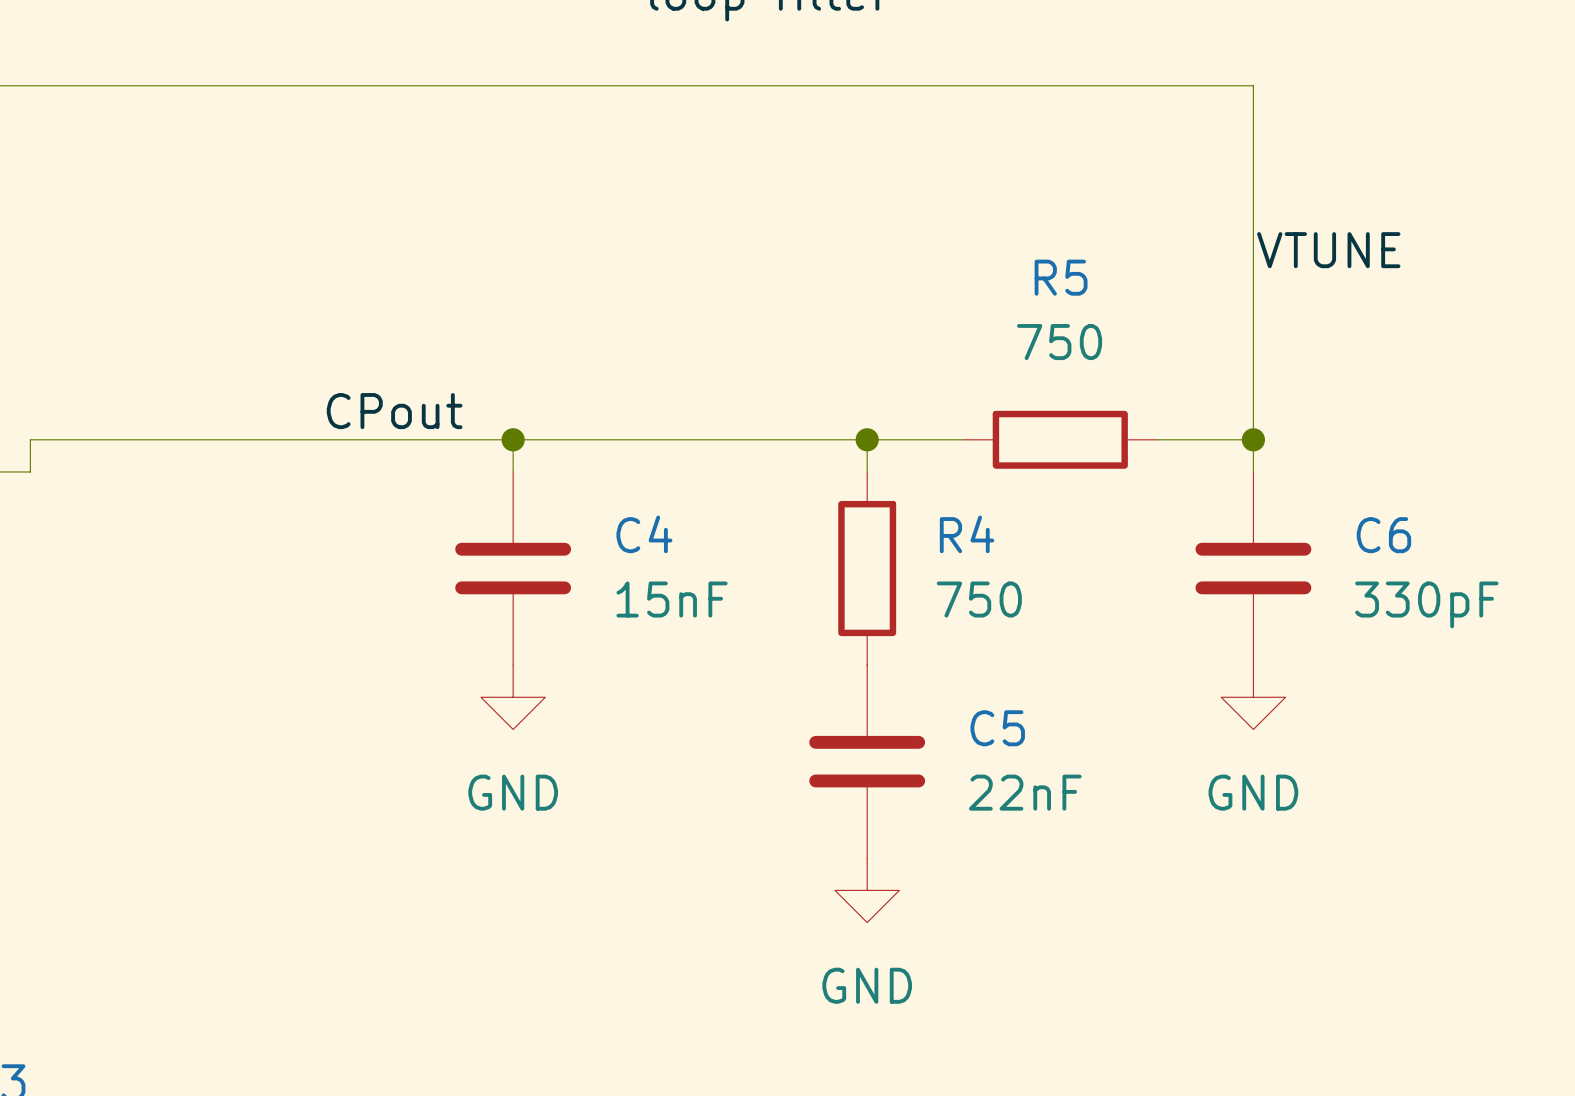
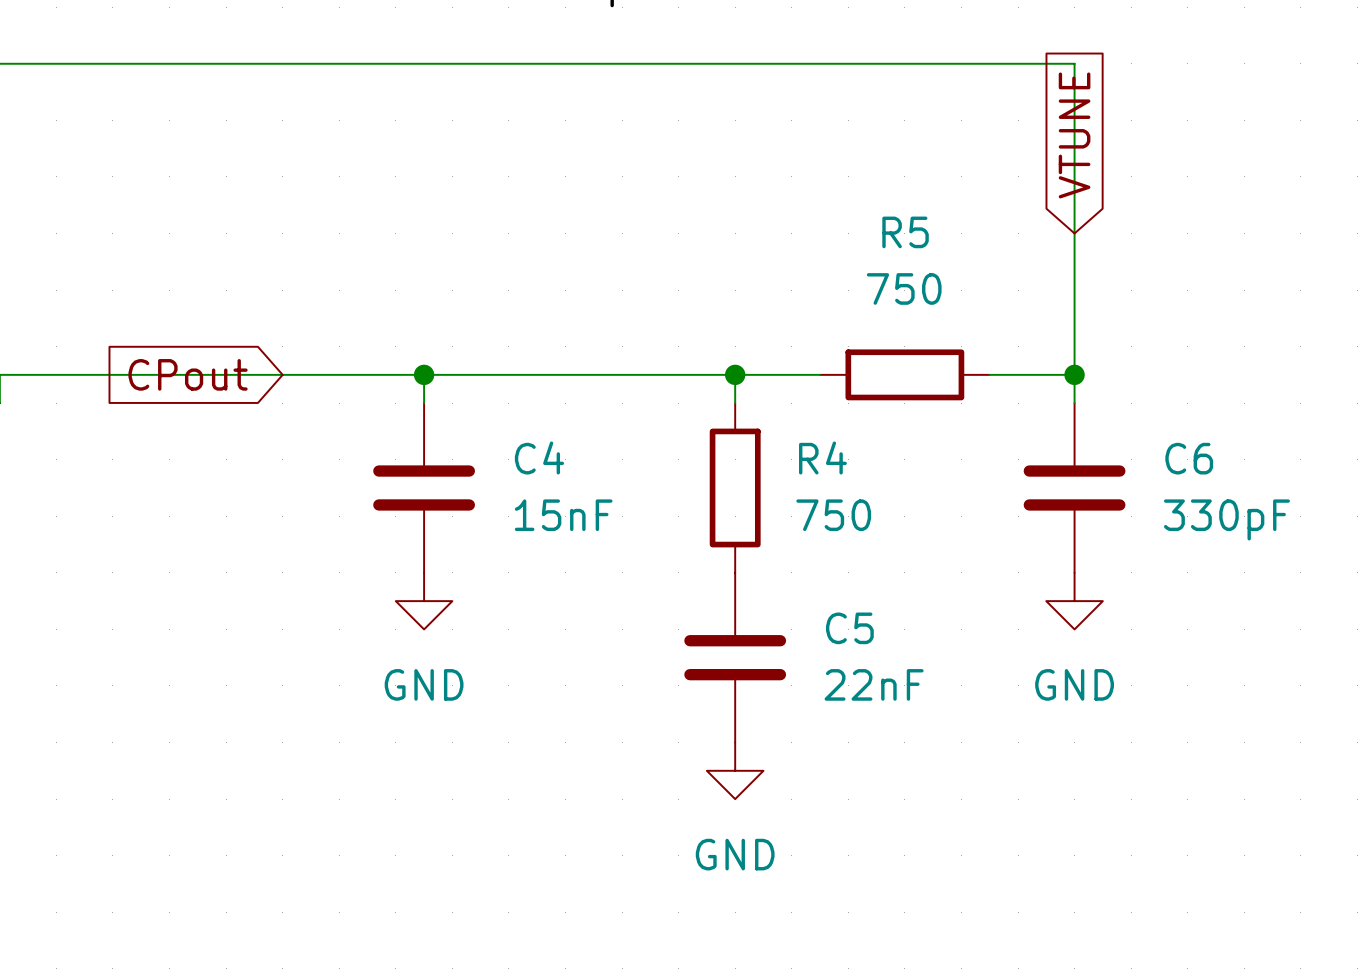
global label: none -> VTUNE (1074, 135)
label: VTUNE (1328, 250) -> none
label: CPout (394, 411) -> none
global label: none -> CPout (188, 374)

